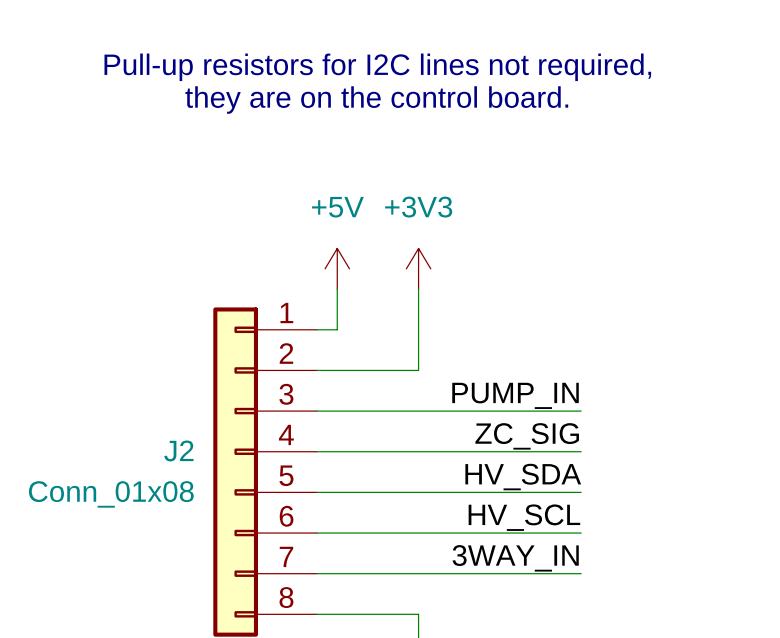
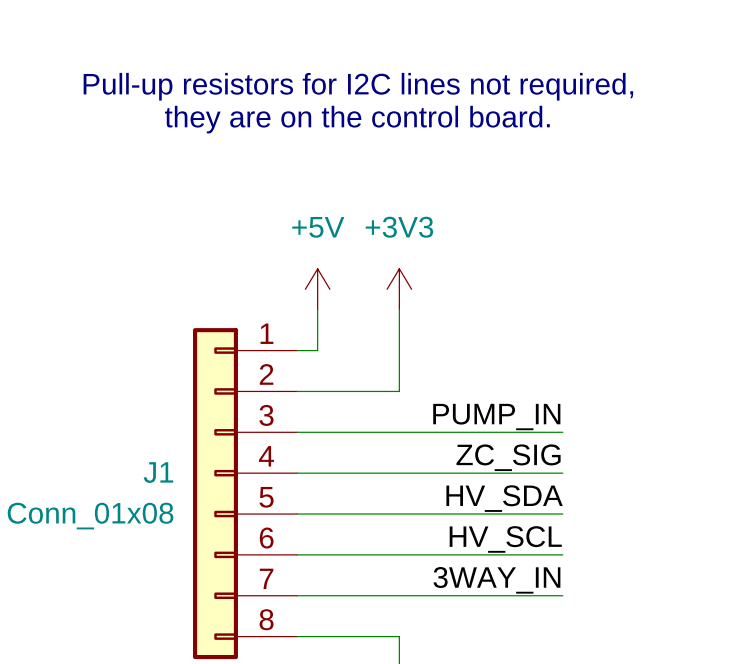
J2 name: J2 (178, 450) -> J1 (158, 472)

